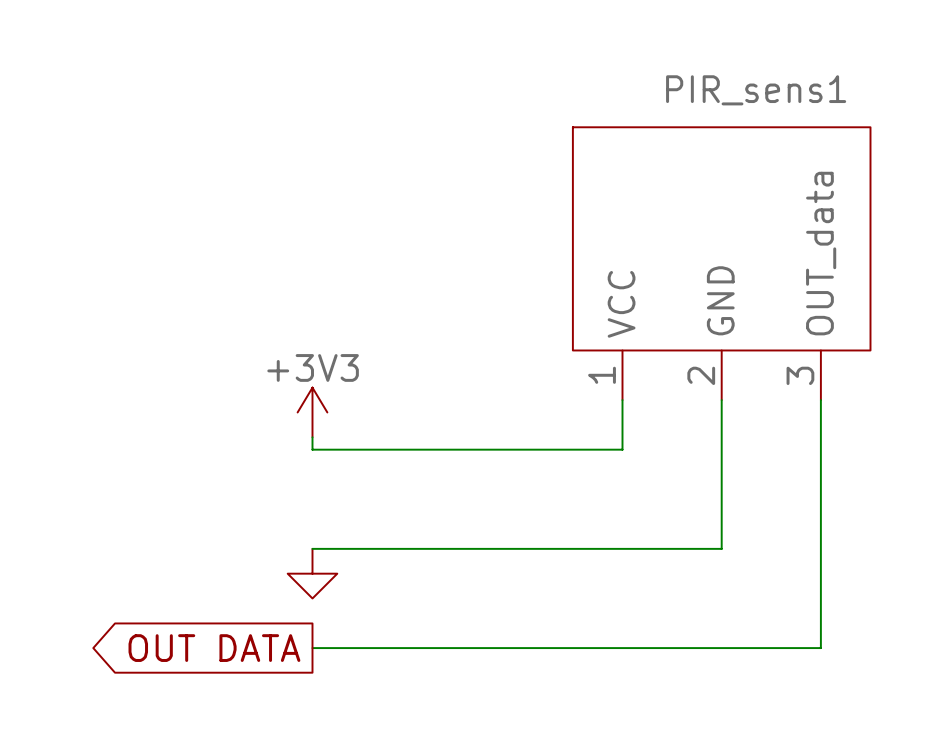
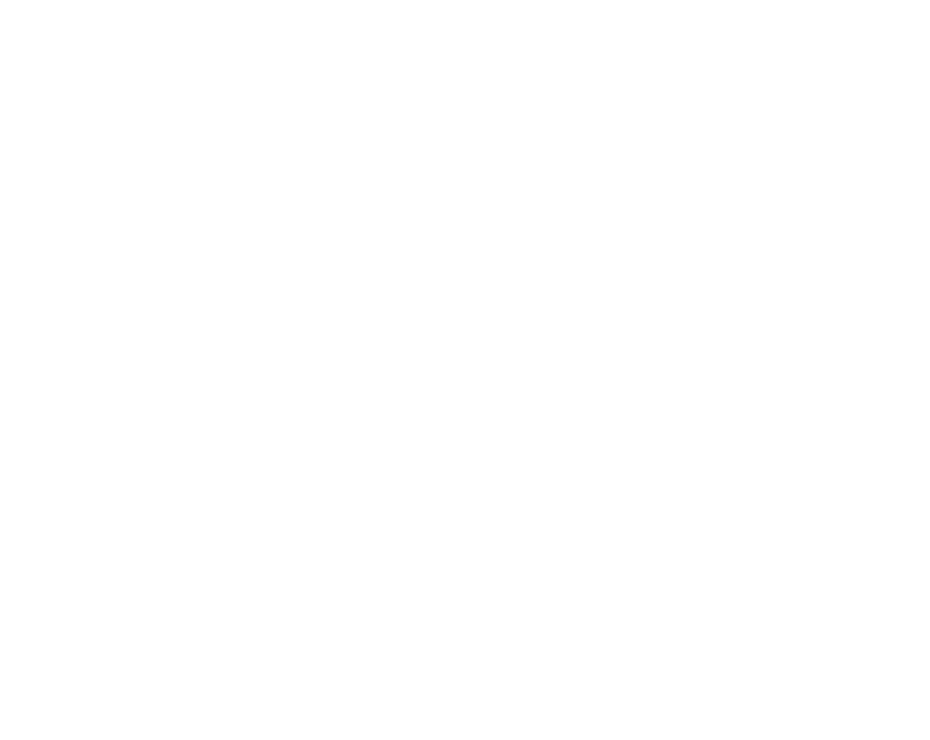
PIR_sens1: (721, 263) -> none
wire: (622, 400) (622, 449) (312, 449) (312, 437) -> none
wire: (721, 400) (721, 548) (312, 548) -> none
wire: (820, 400) (820, 648) (312, 648) -> none
power symbol: +3V3 (312, 412) -> none
power symbol: (312, 573) -> none
global label: OUT DATA (214, 648) -> none

